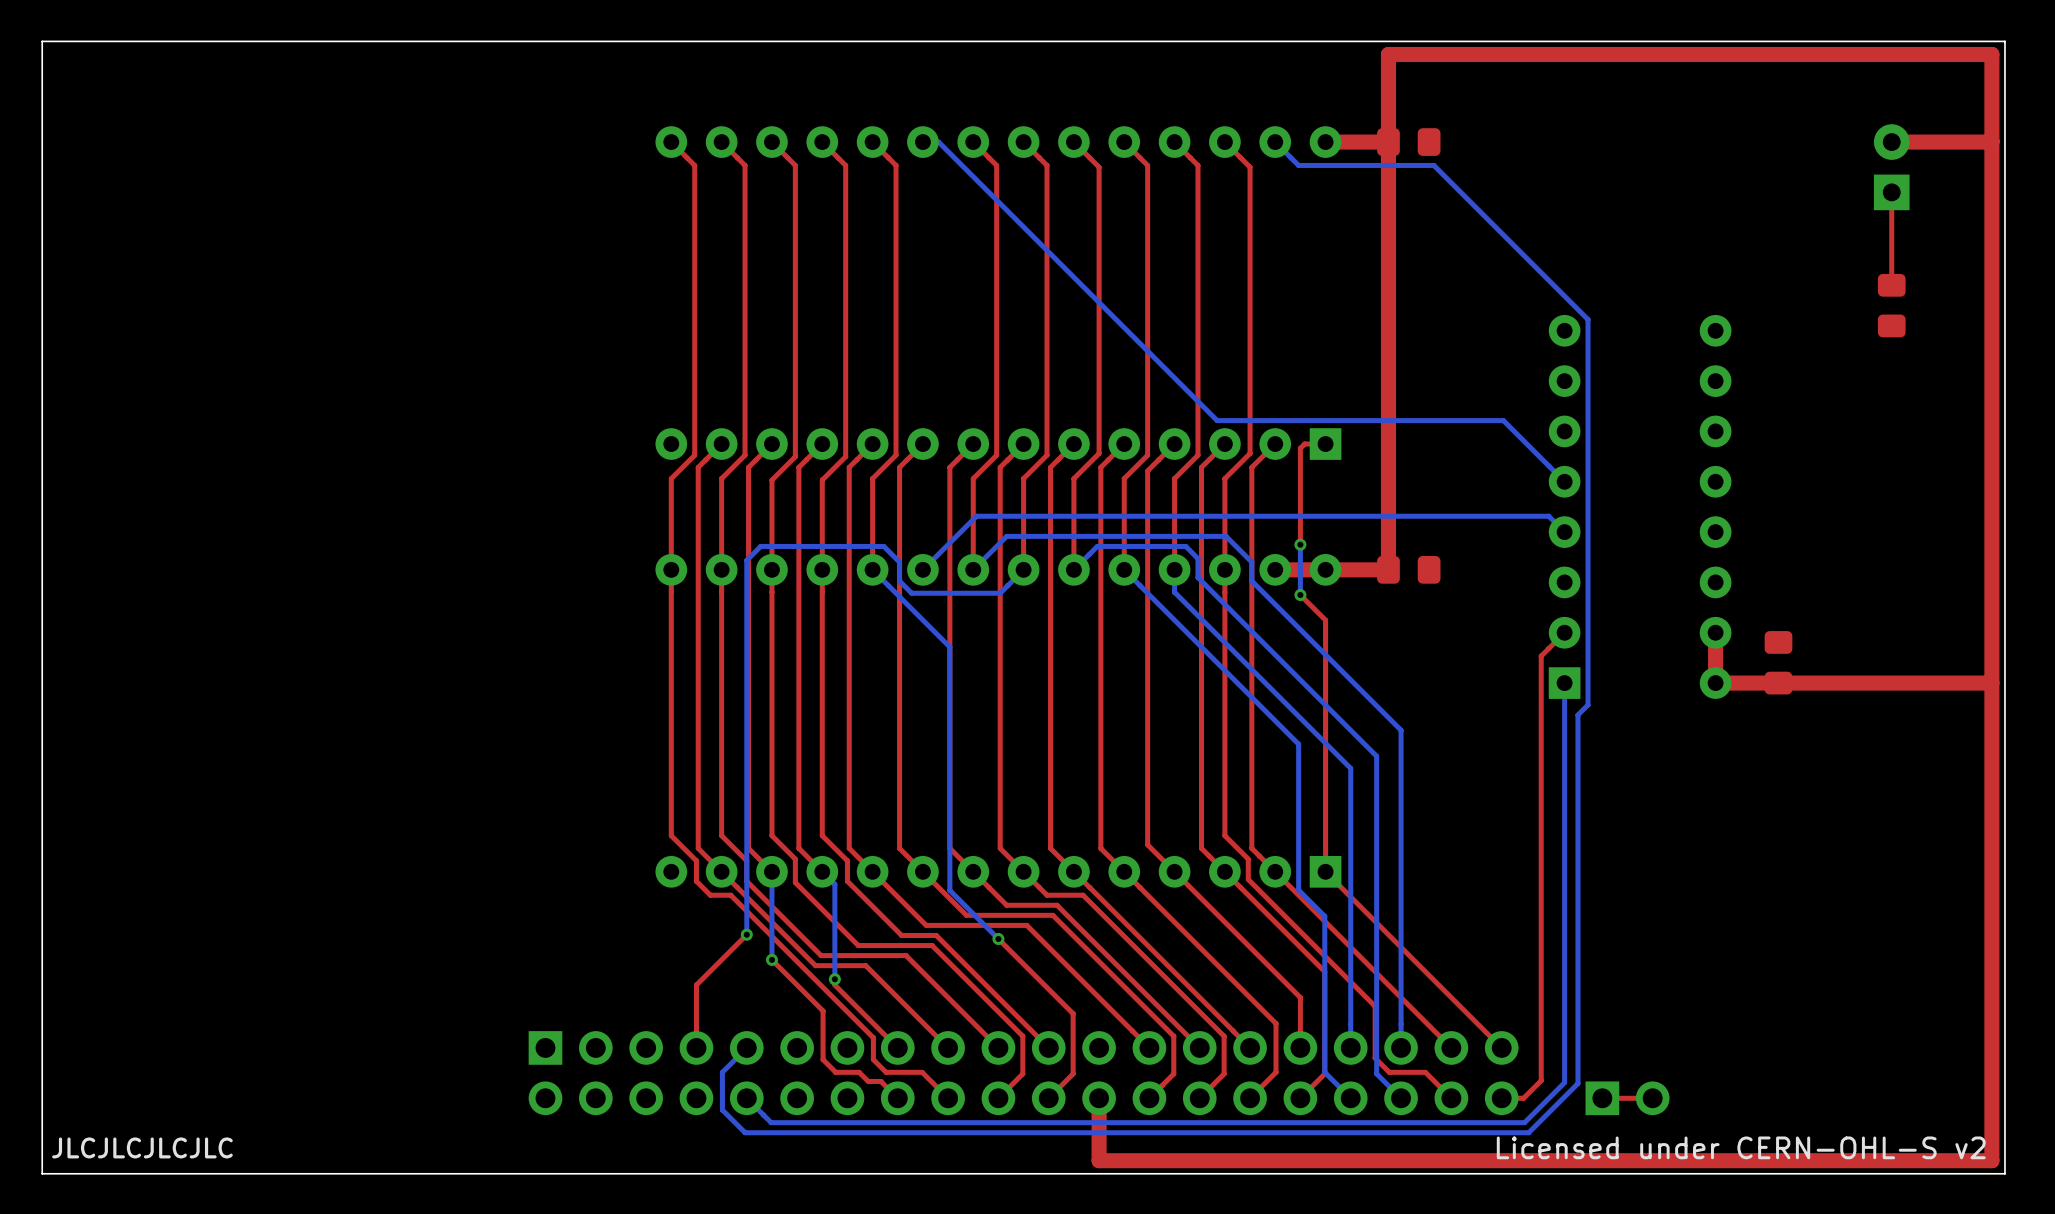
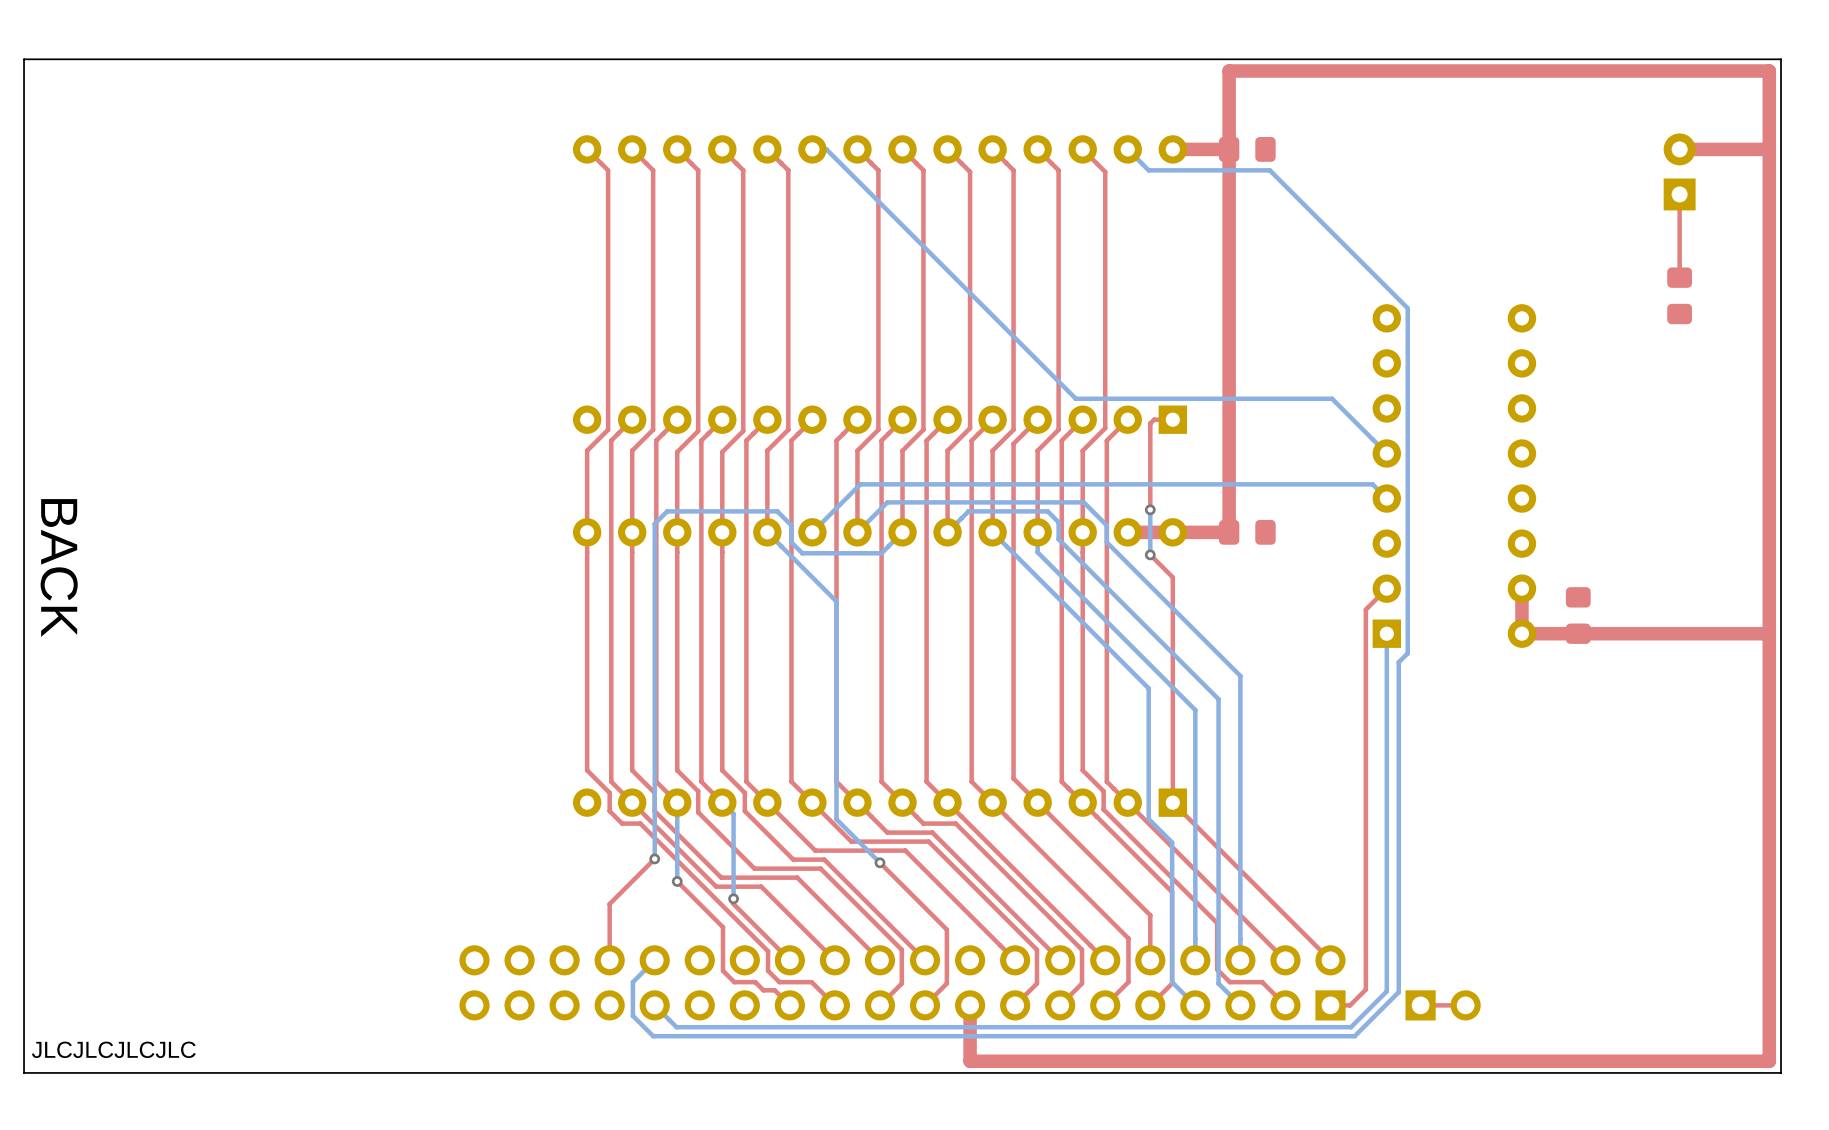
text: none -> BACK (59, 567)
part rotation: 0° (1023, 1073) -> 180° (902, 982)
text: Licensed under CERN-OHL-S v2 (1741, 1147) -> none

